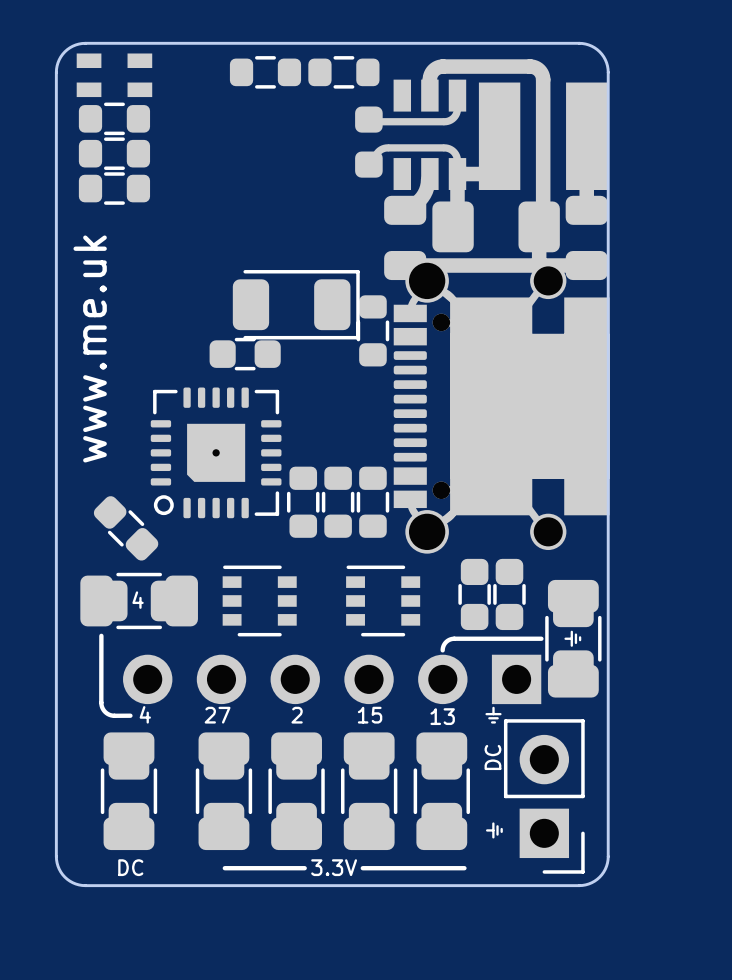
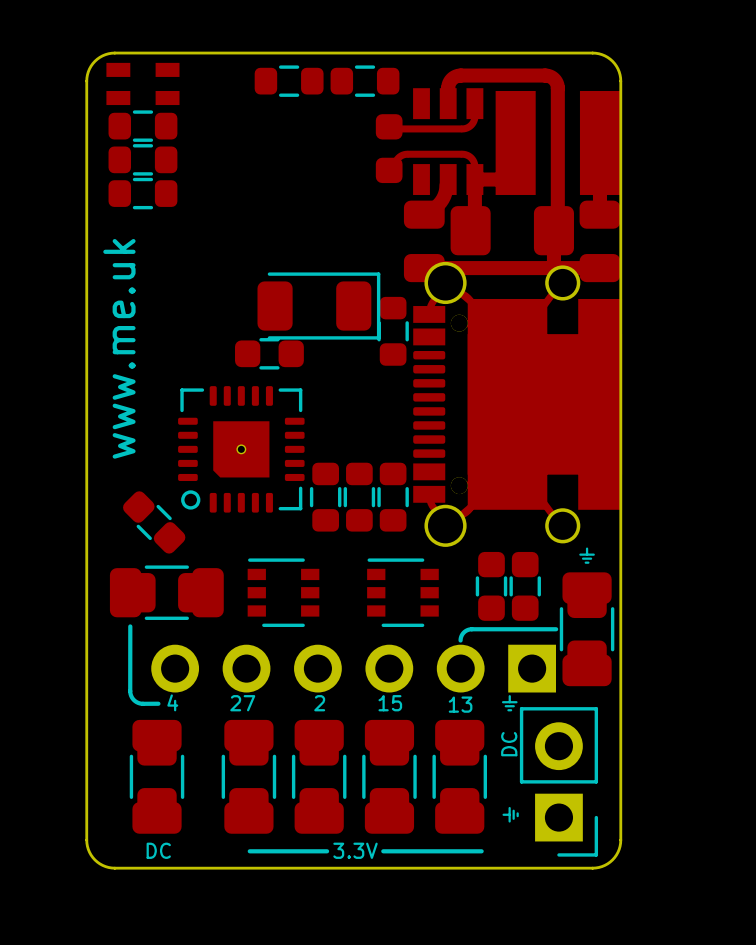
text: 4 (138, 600) -> none
text rotation: 0° (572, 638) -> 90° clockwise (587, 555)
text position: ⏚ (572, 638) -> ⏚ (587, 555)

